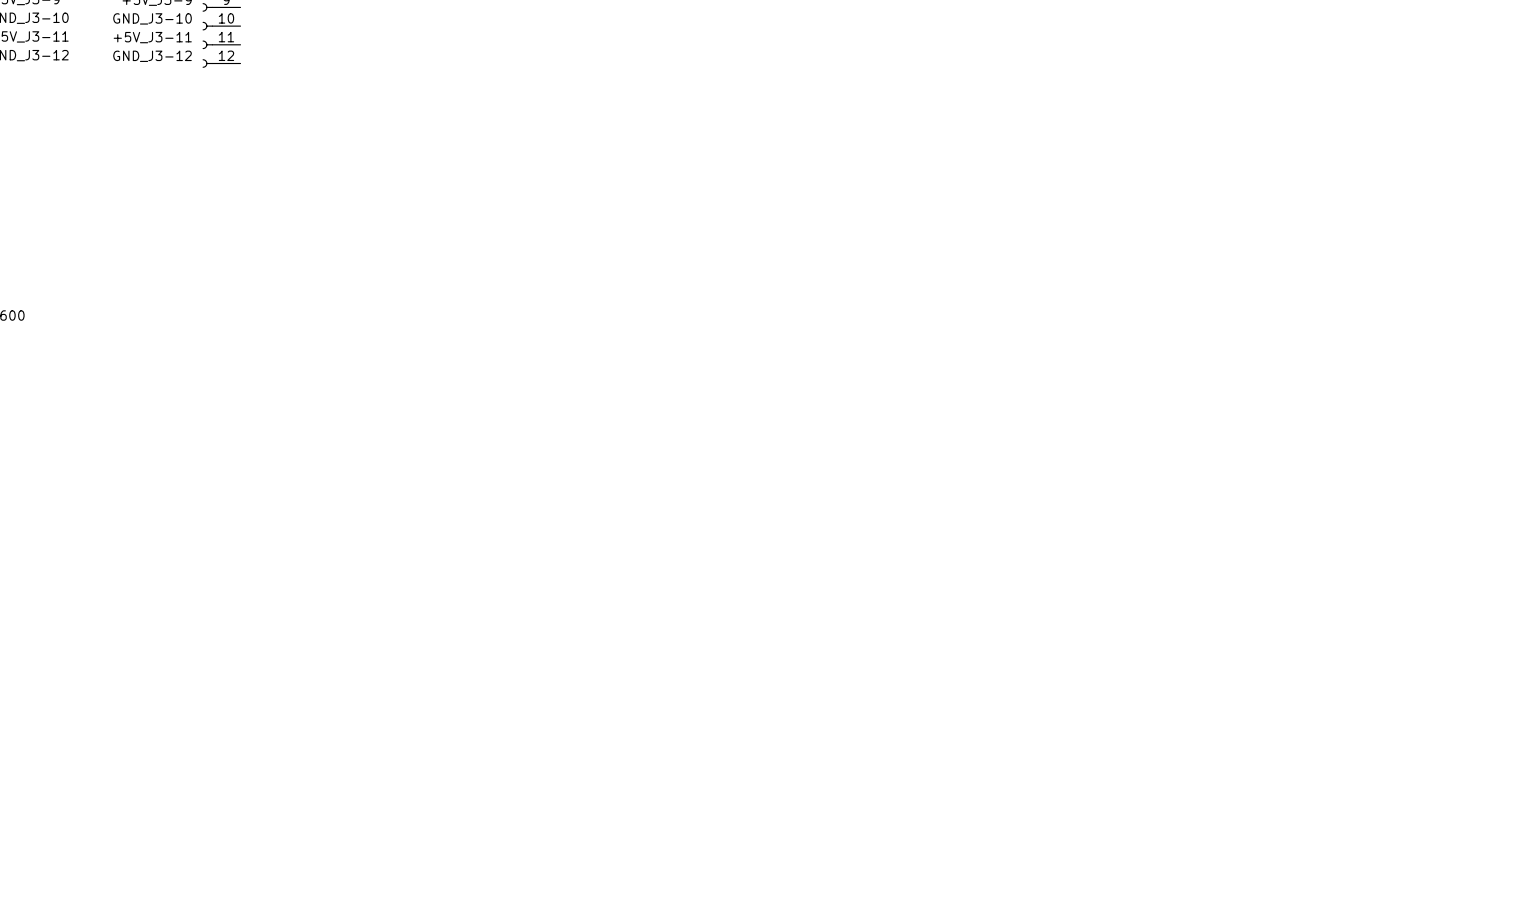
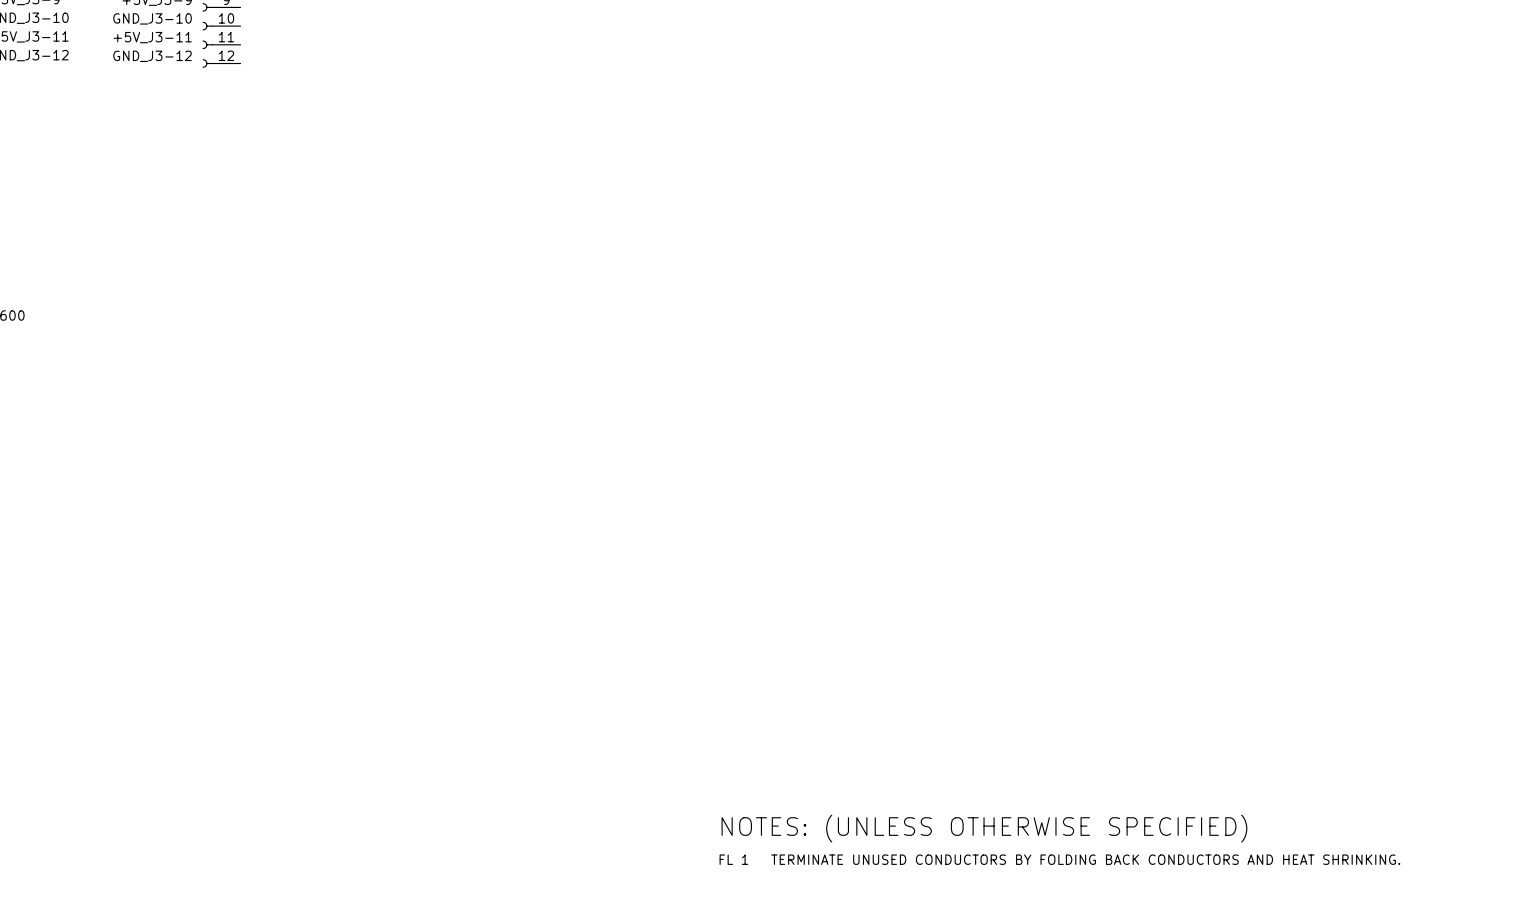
text: none -> NOTES: (UNLESS OTHERWISE SPECIFIED) (984, 828)
text: none -> FL 1 TERMINATE UNUSED CONDUCTORS BY FOLDING BACK CONDUCTORS AND HEAT SHRINKING. (1059, 859)

